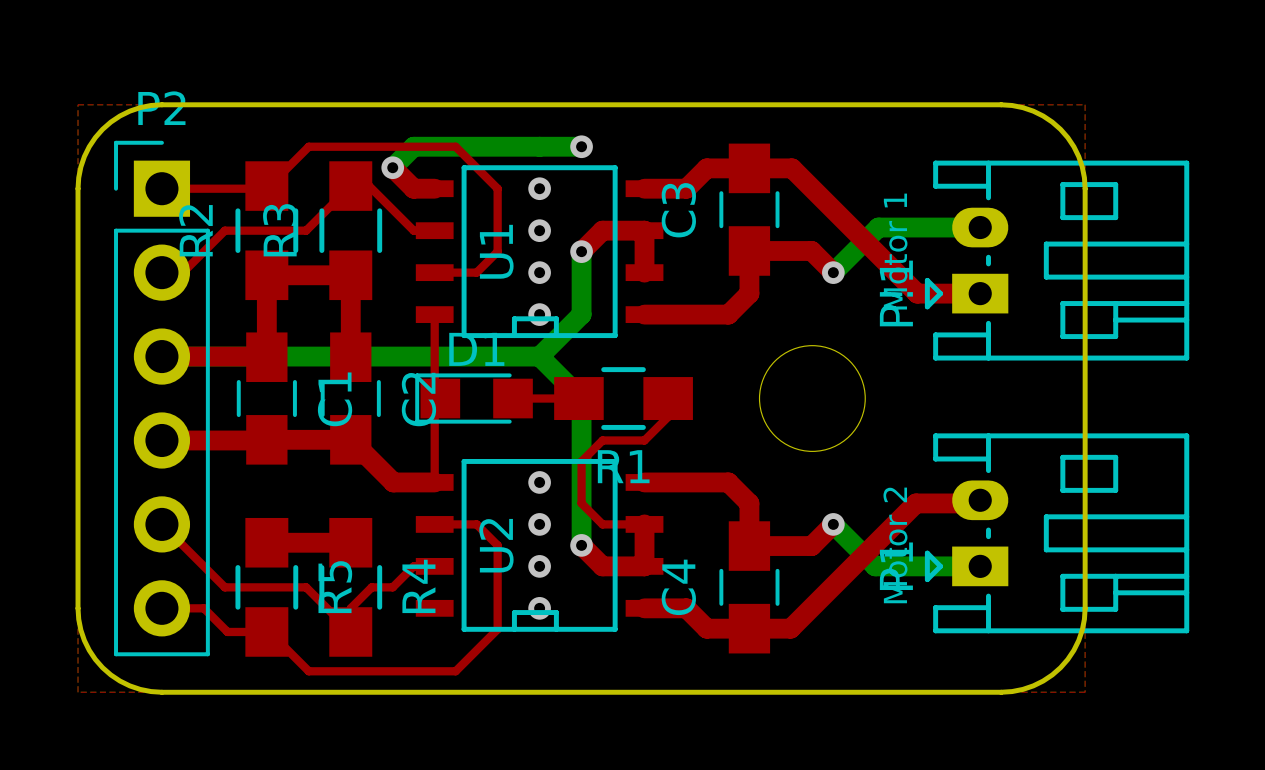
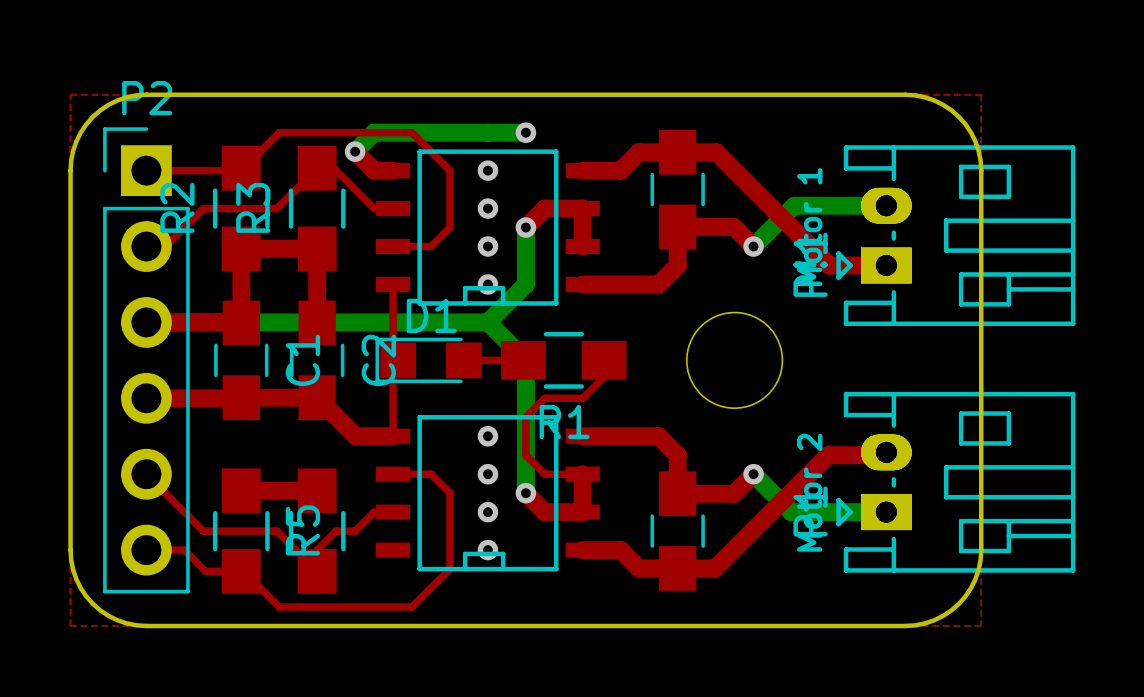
C3 name: C3 (678, 210) -> none
U1 name: U1 (496, 251) -> none
part: none -> (886, 235)
part: none -> (886, 482)
U2 name: U2 (496, 545) -> none
R4 name: R4 (418, 586) -> none
C4 name: C4 (678, 587) -> none

